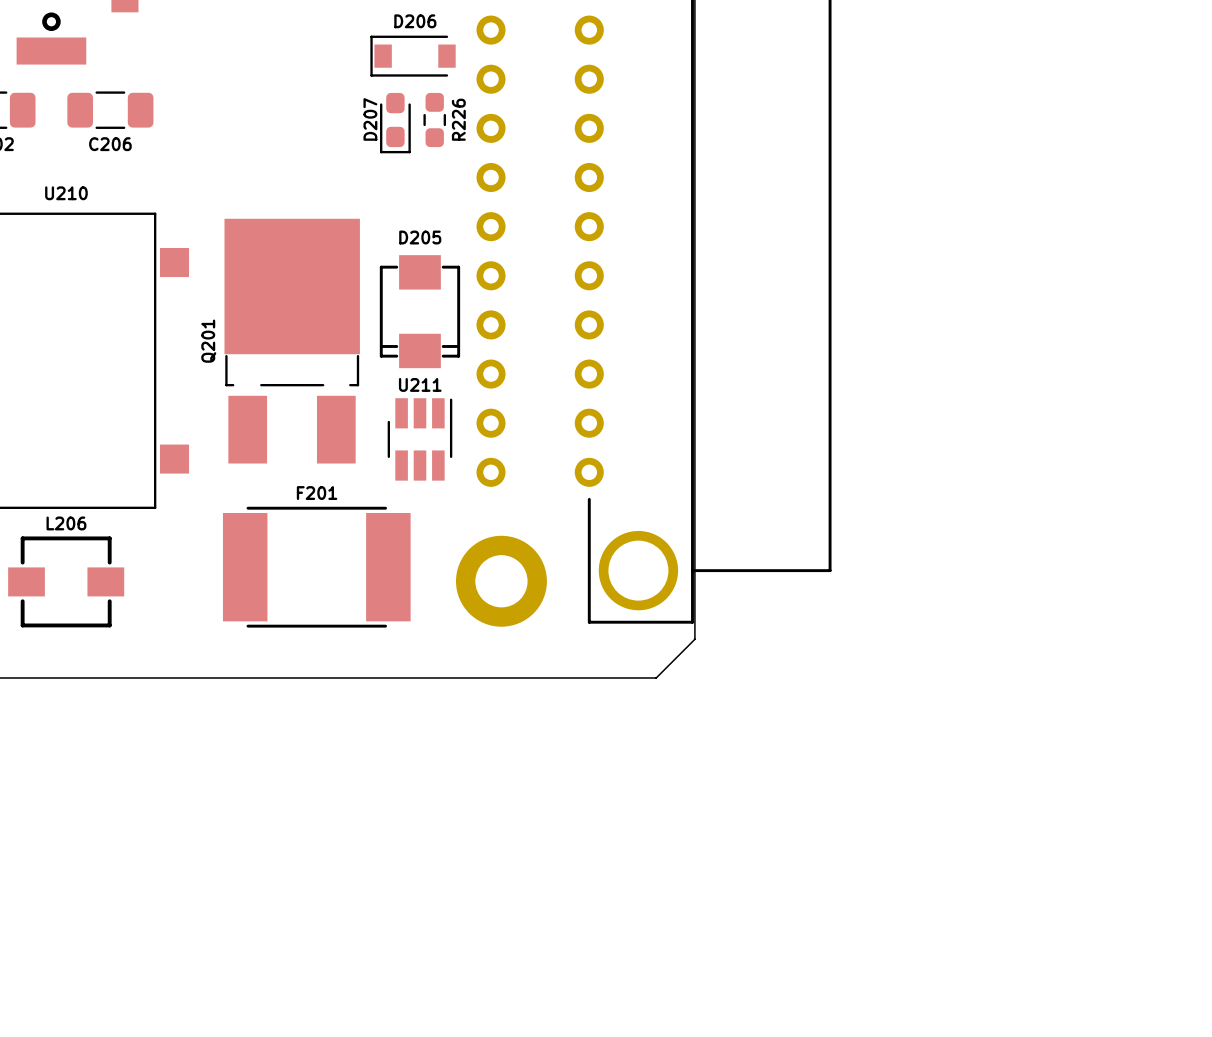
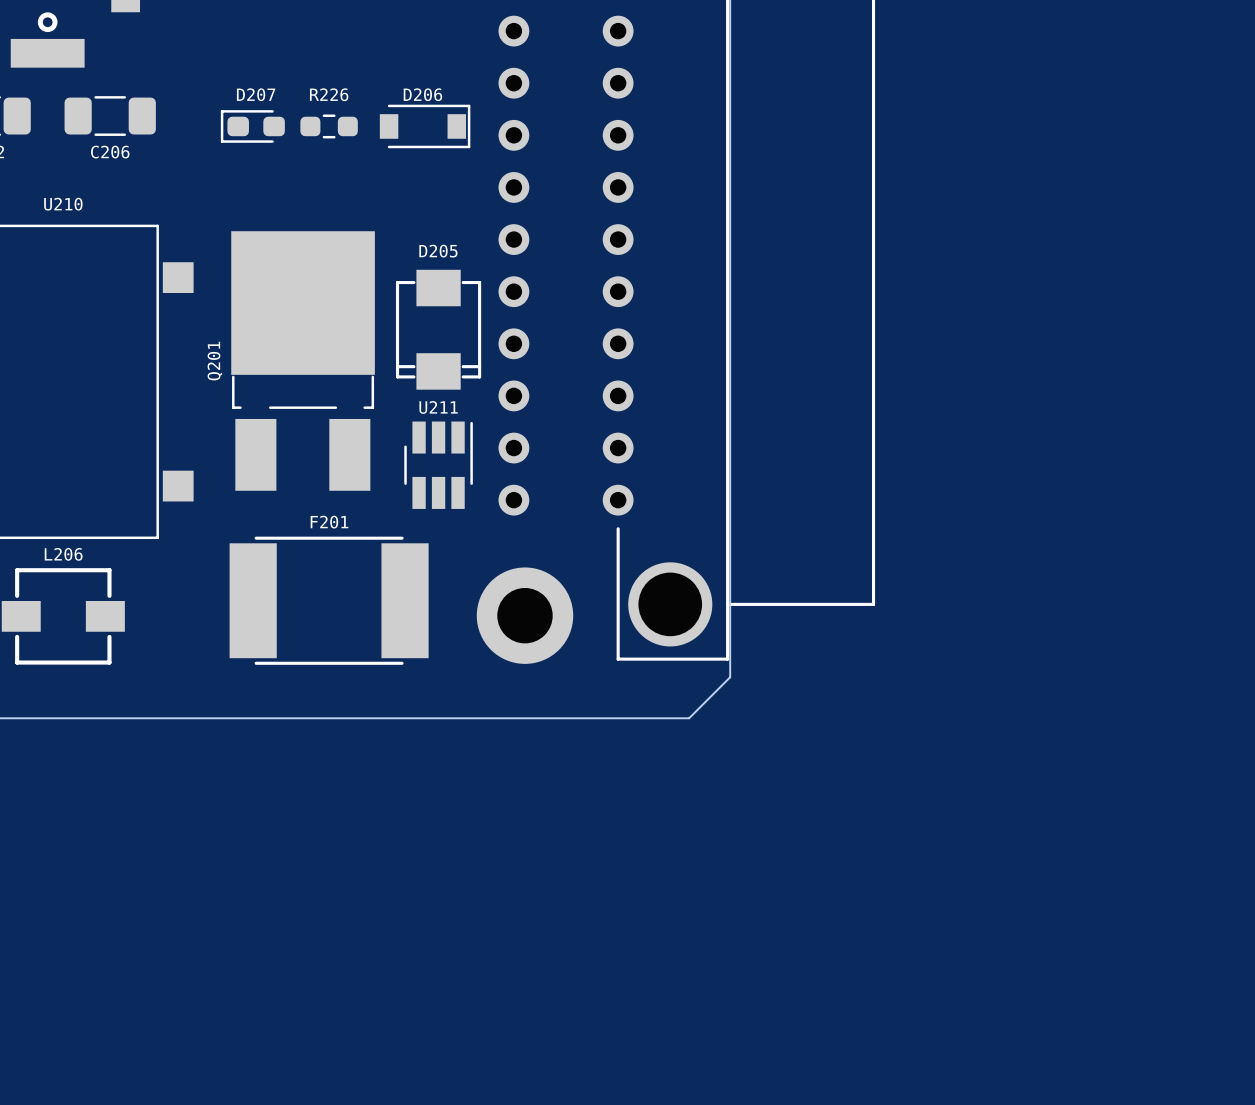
D206 rotation: 0° (413, 56) -> 180° (425, 126)
D206 position: (413, 56) -> (425, 126)
R226 rotation: 0° (434, 120) -> 90° clockwise (329, 126)
R226 position: (434, 120) -> (329, 126)
D207 rotation: 0° (395, 123) -> 90° clockwise (252, 126)
D207 position: (395, 123) -> (252, 126)

